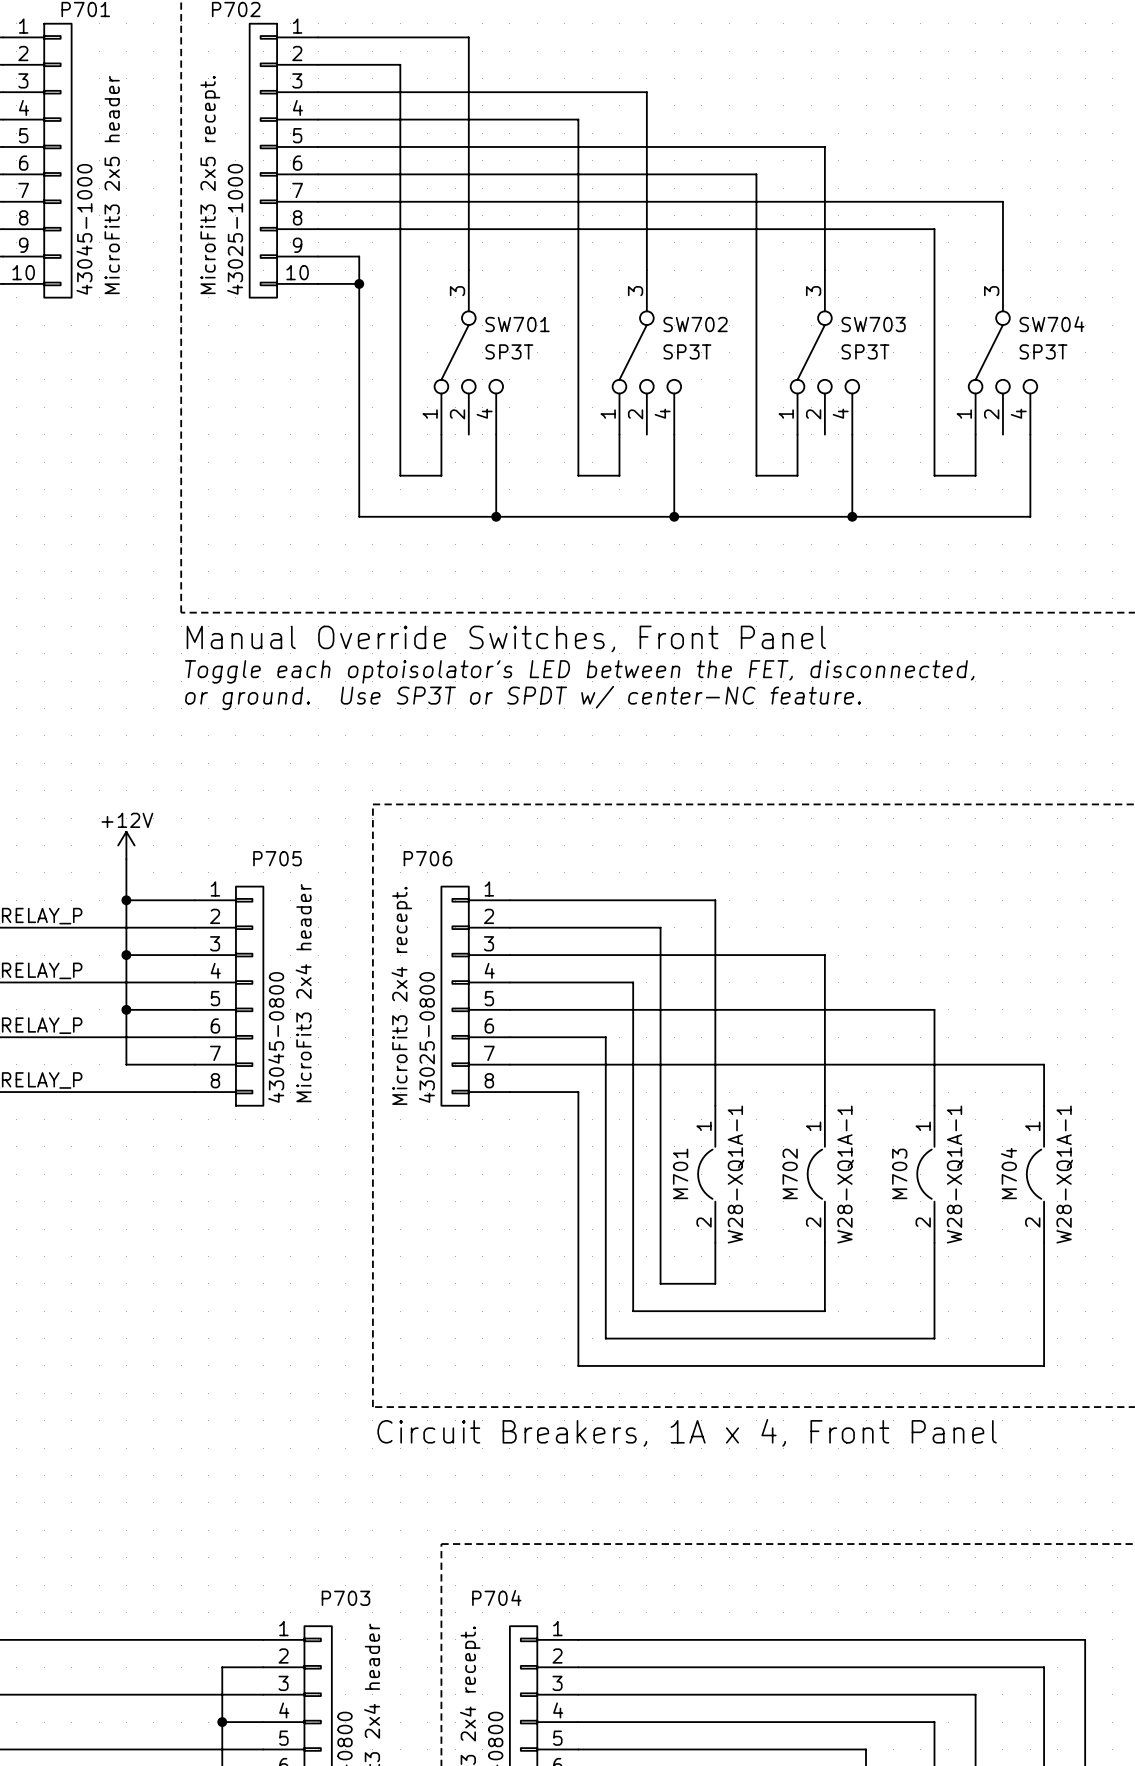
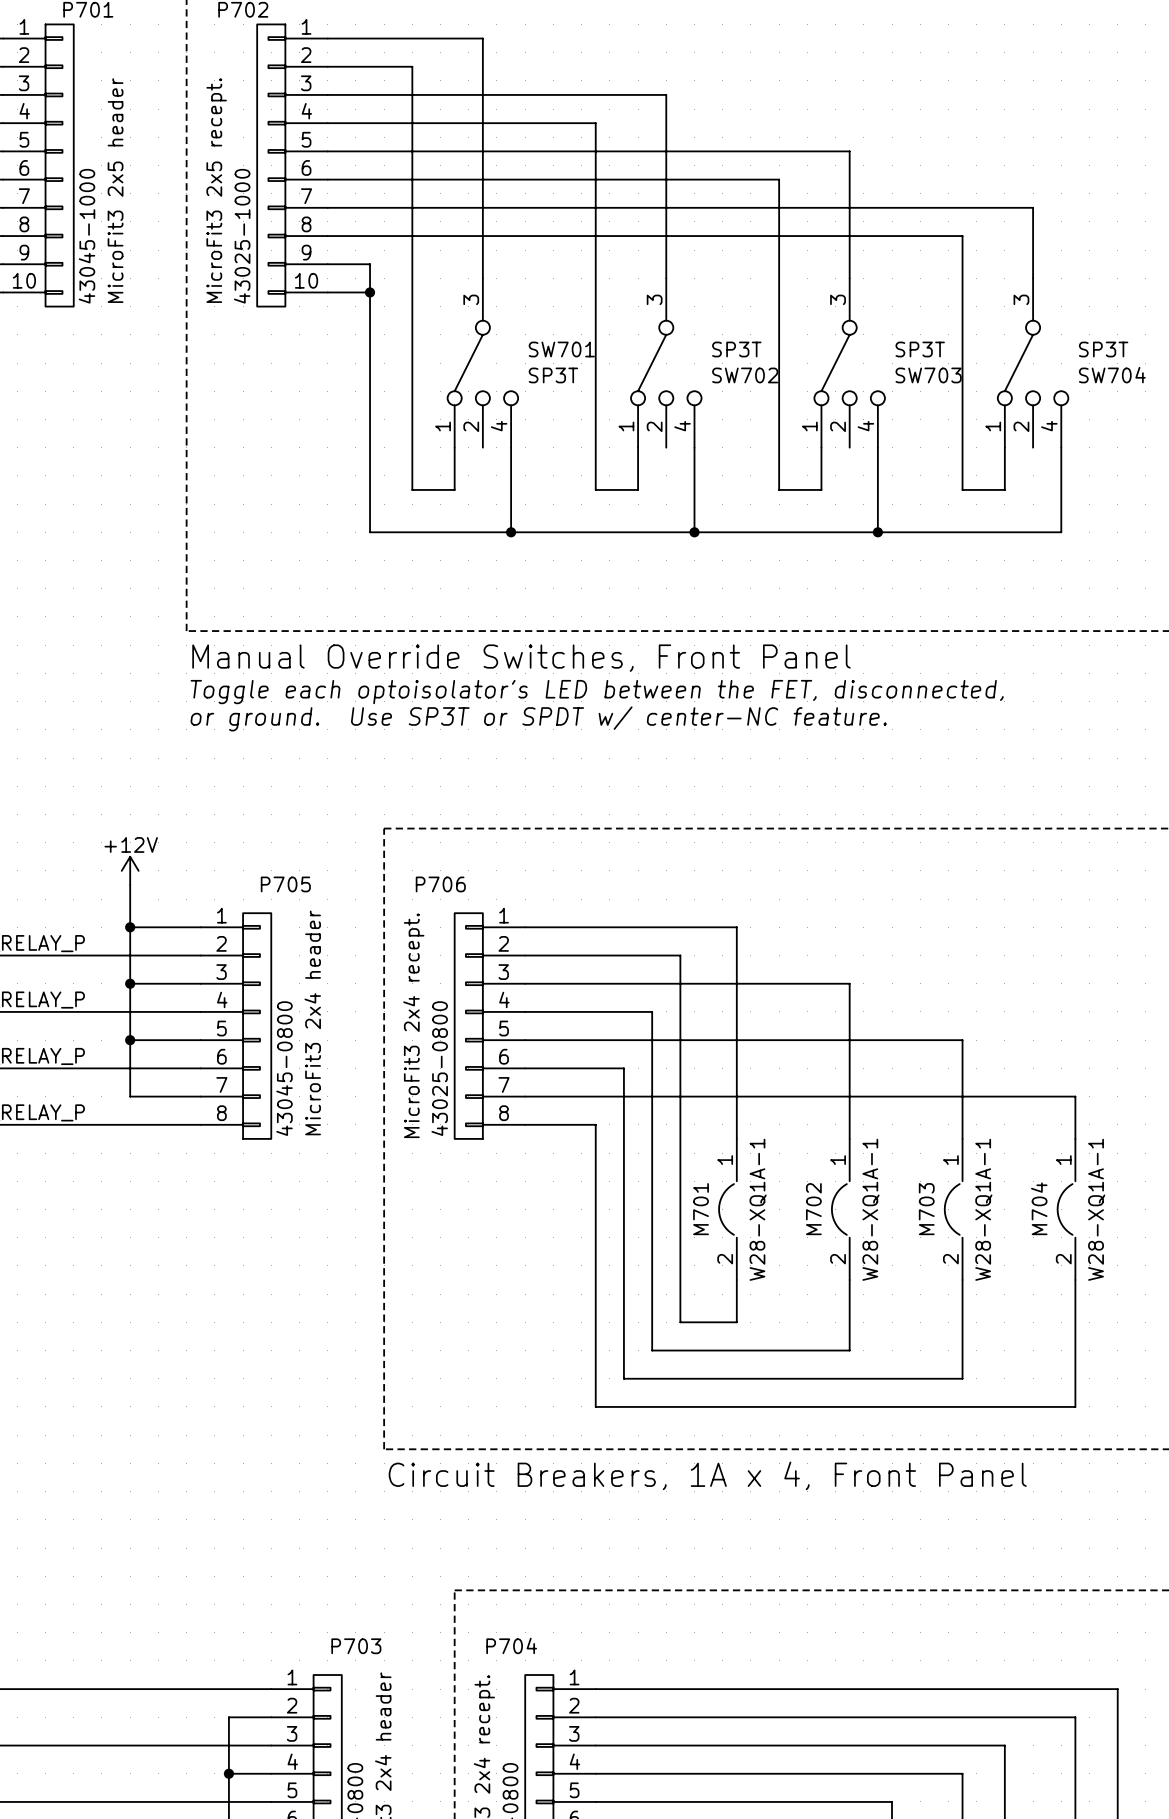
SW701 name position: SW701 (517, 324) -> SW701 (561, 349)
SW702 name position: SW702 (695, 324) -> SW702 (745, 375)
SW703 name position: SW703 (873, 324) -> SW703 (928, 375)
SW704 name position: SW704 (1051, 324) -> SW704 (1112, 375)
SW701 value position: SP3T (509, 351) -> SP3T (553, 375)
SW702 value position: SP3T (687, 351) -> SP3T (736, 349)
SW703 value position: SP3T (865, 351) -> SP3T (920, 349)
SW704 value position: SP3T (1043, 351) -> SP3T (1103, 349)

